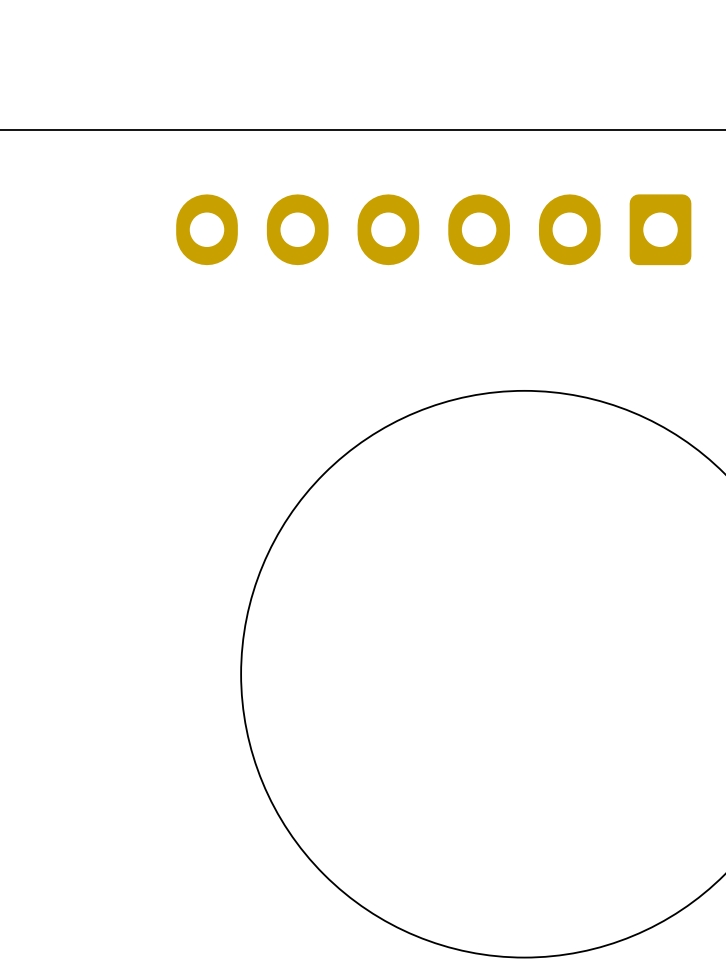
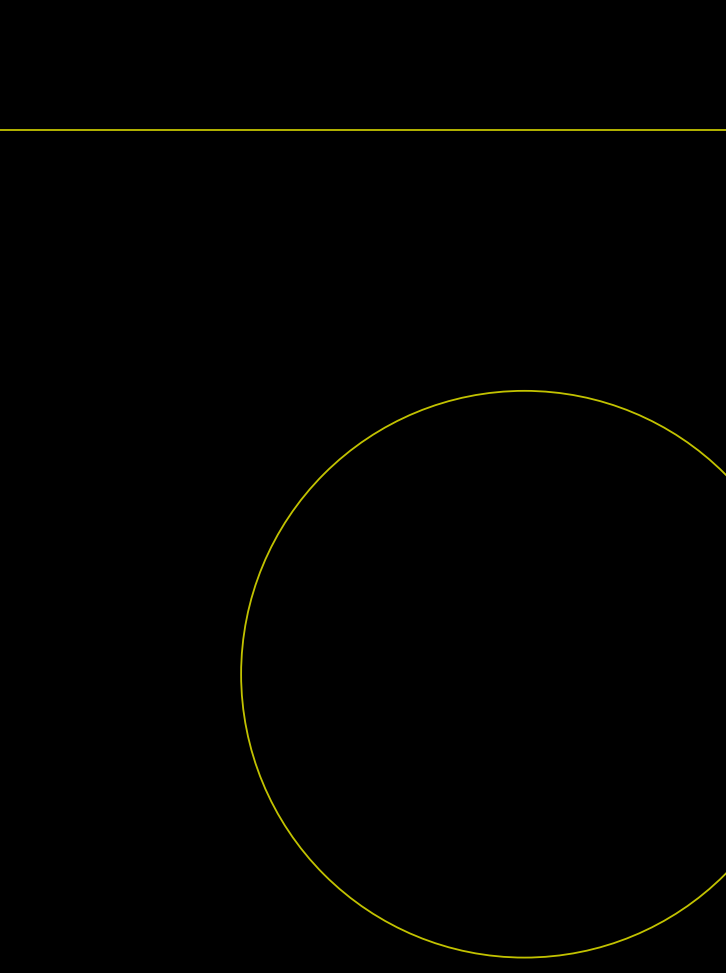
part: (433, 229) -> none

